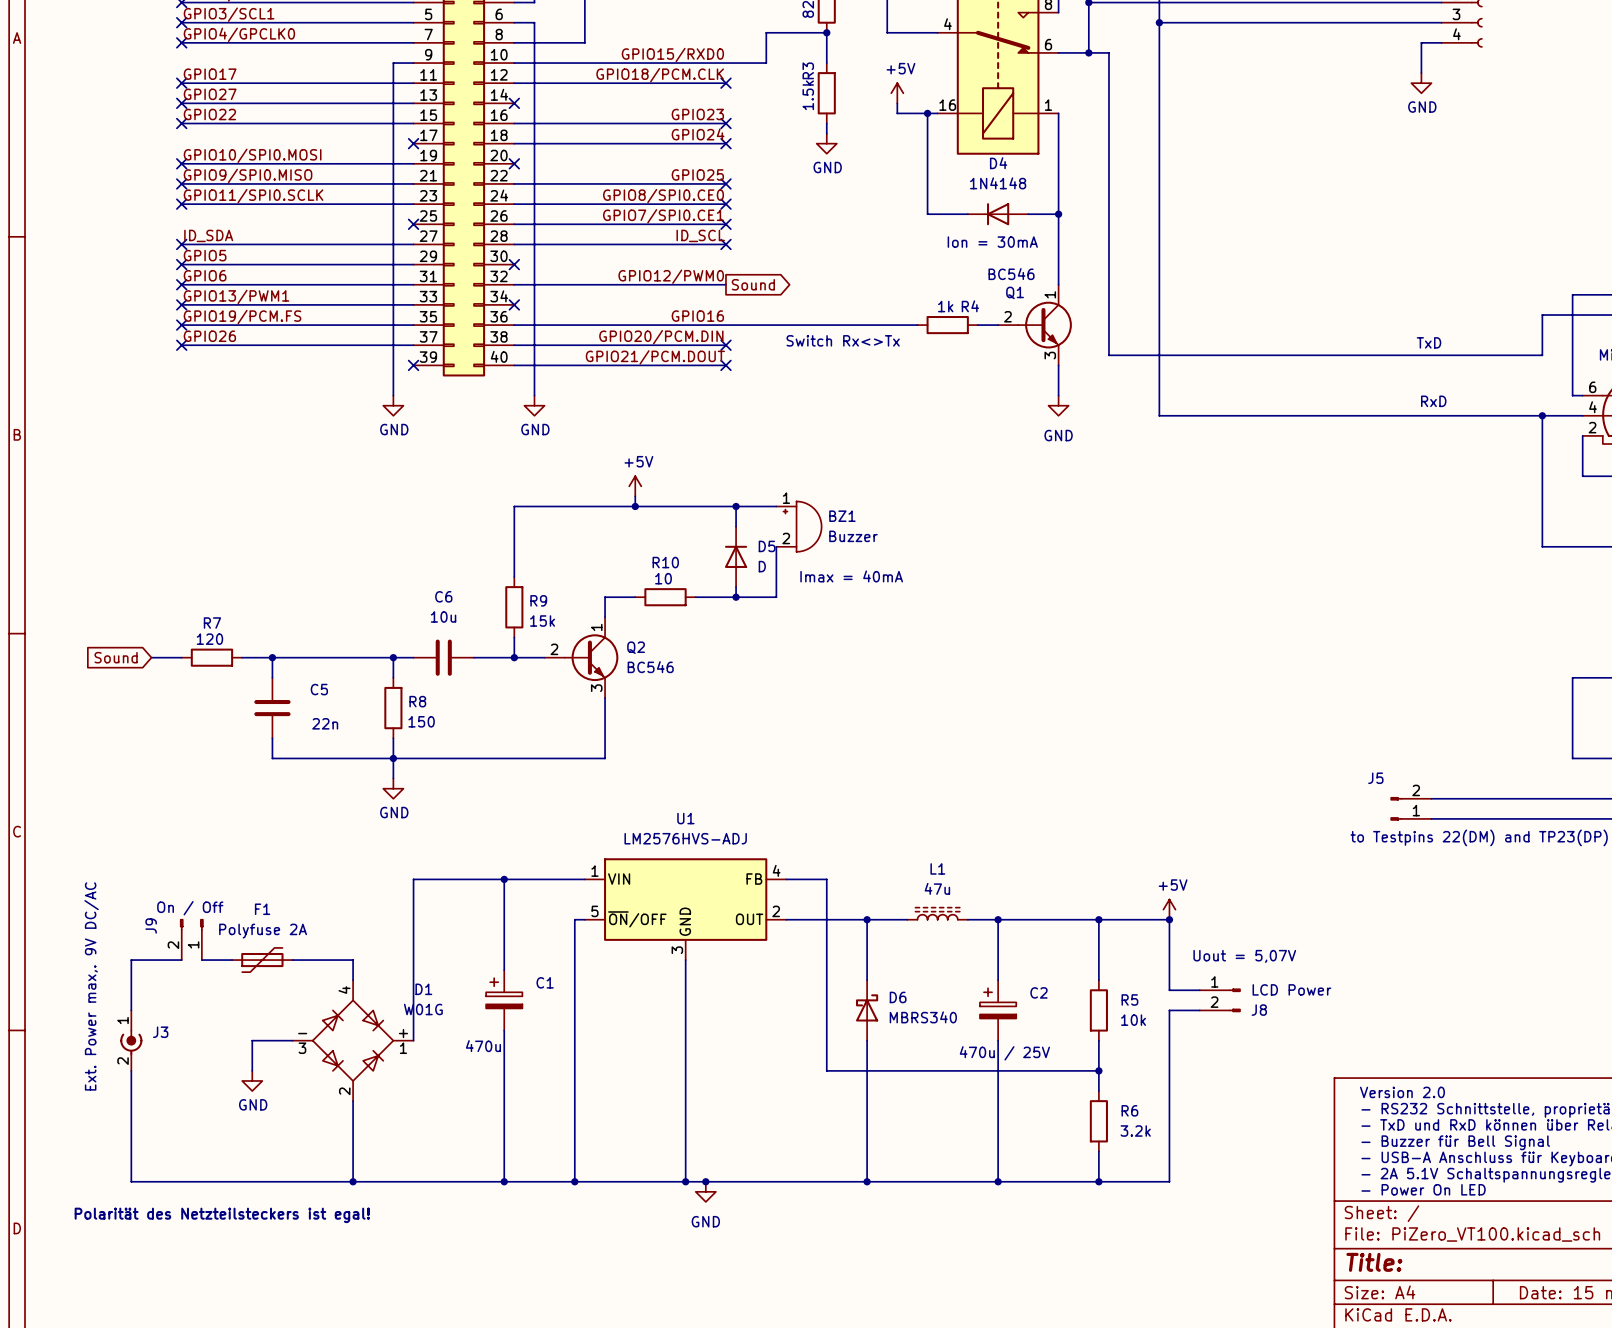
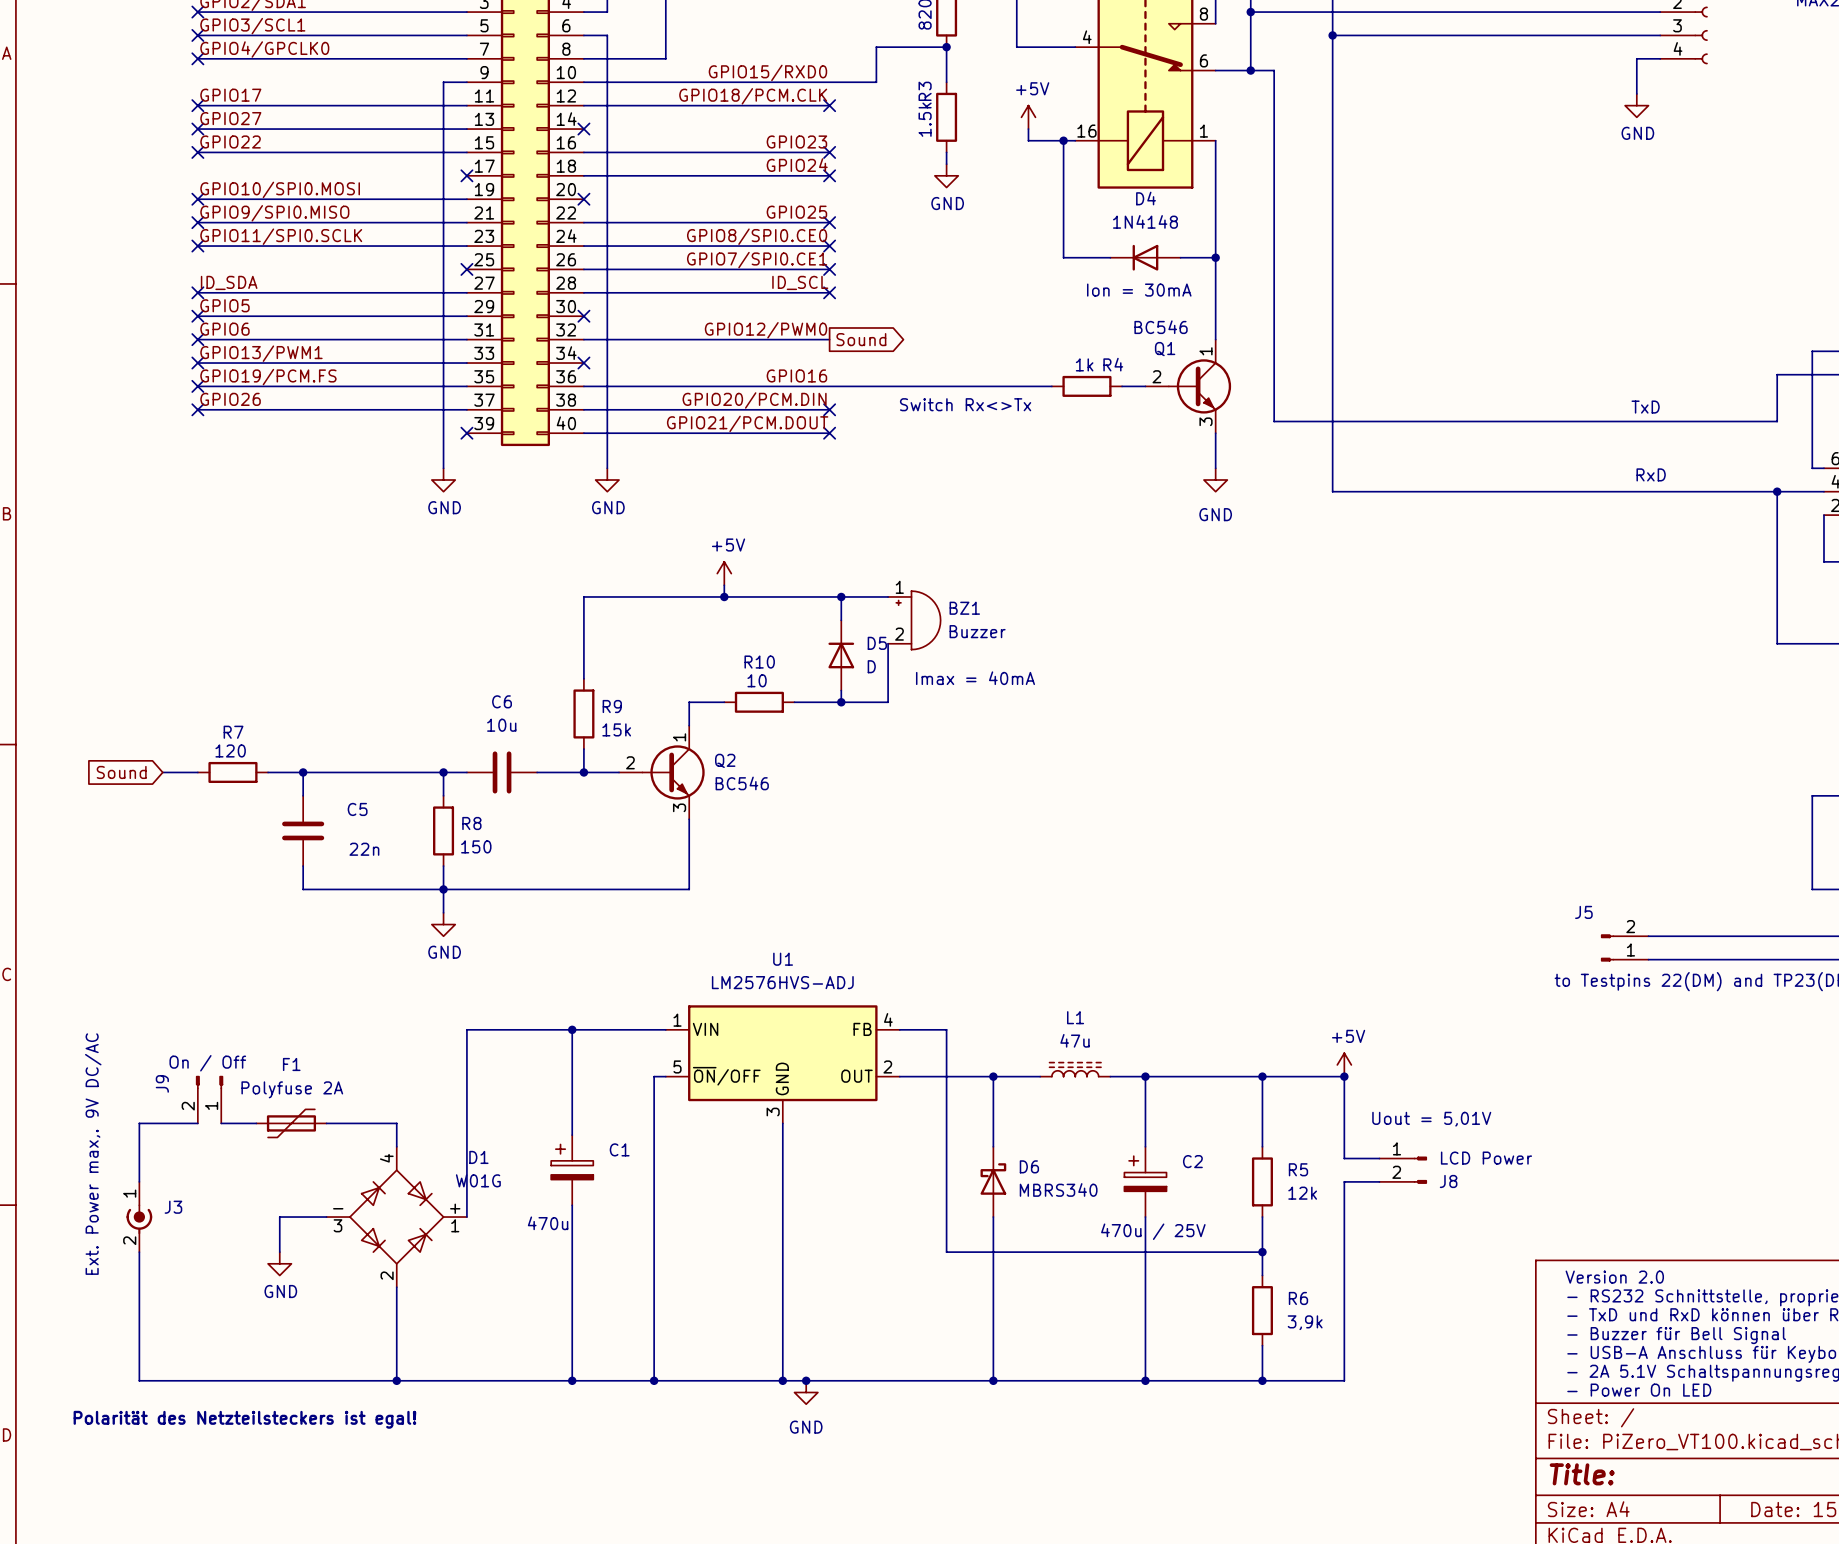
text: Uout = 5,07V (1244, 956) -> Uout = 5,01V (1431, 1119)
R5 value: 10k (1133, 1020) -> 12k (1302, 1193)
R6 value: 3.2k (1135, 1131) -> 3,9k (1305, 1322)

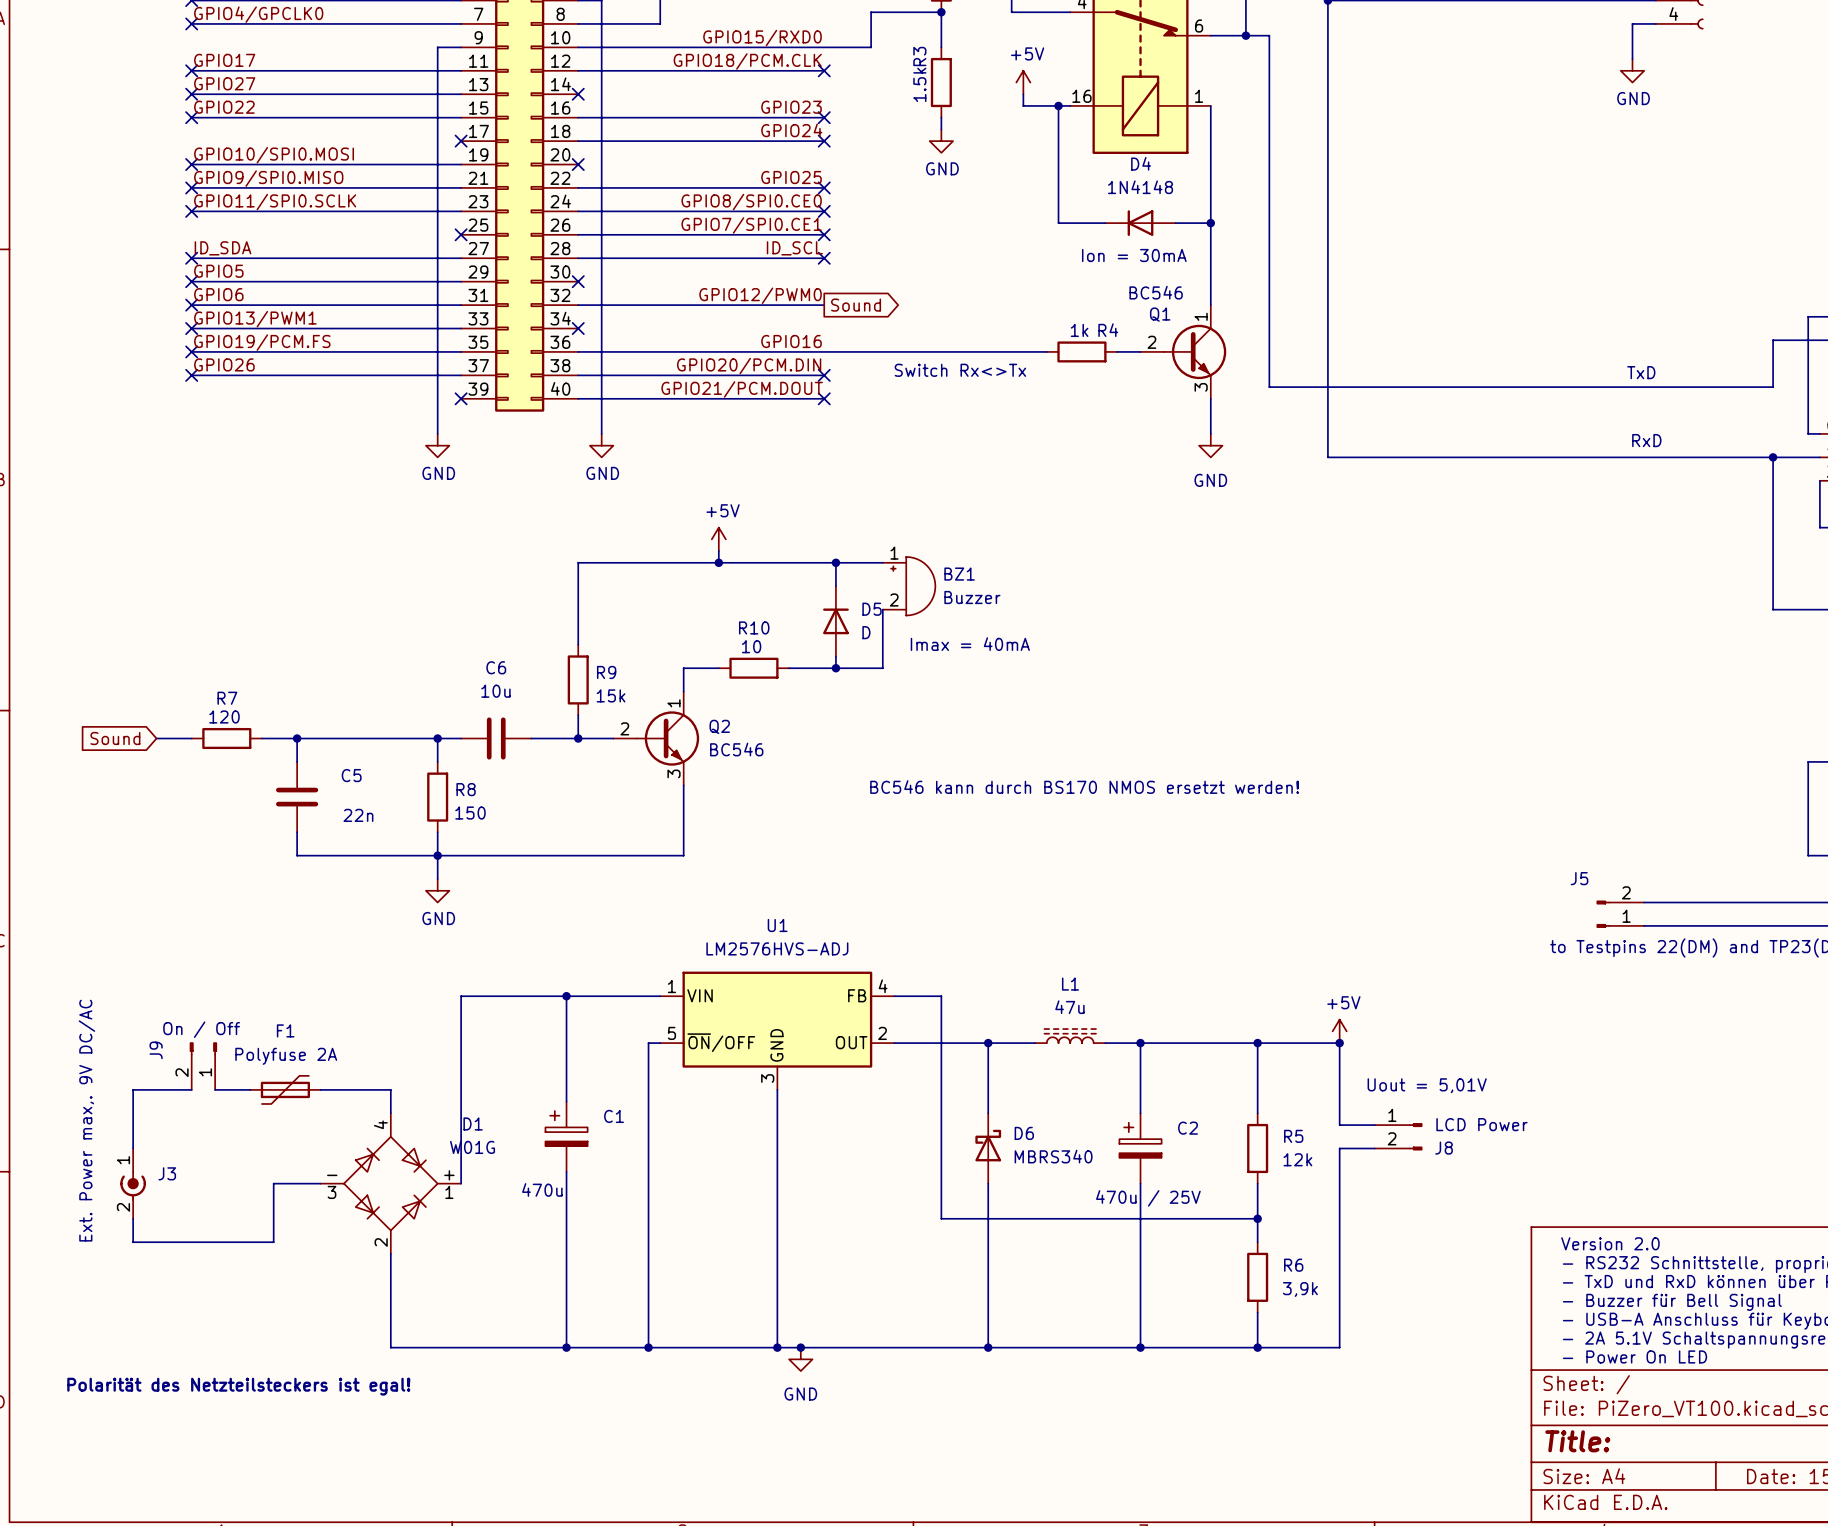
text: none -> BC546 kann durch BS170 NMOS ersetzt werden! (1084, 787)
power symbol: GND (279, 1263) -> none
wire: (139, 1275) (139, 1380) (396, 1380) -> (133, 1242) (273, 1242) (273, 1218)
junction: (396, 1380) -> none

